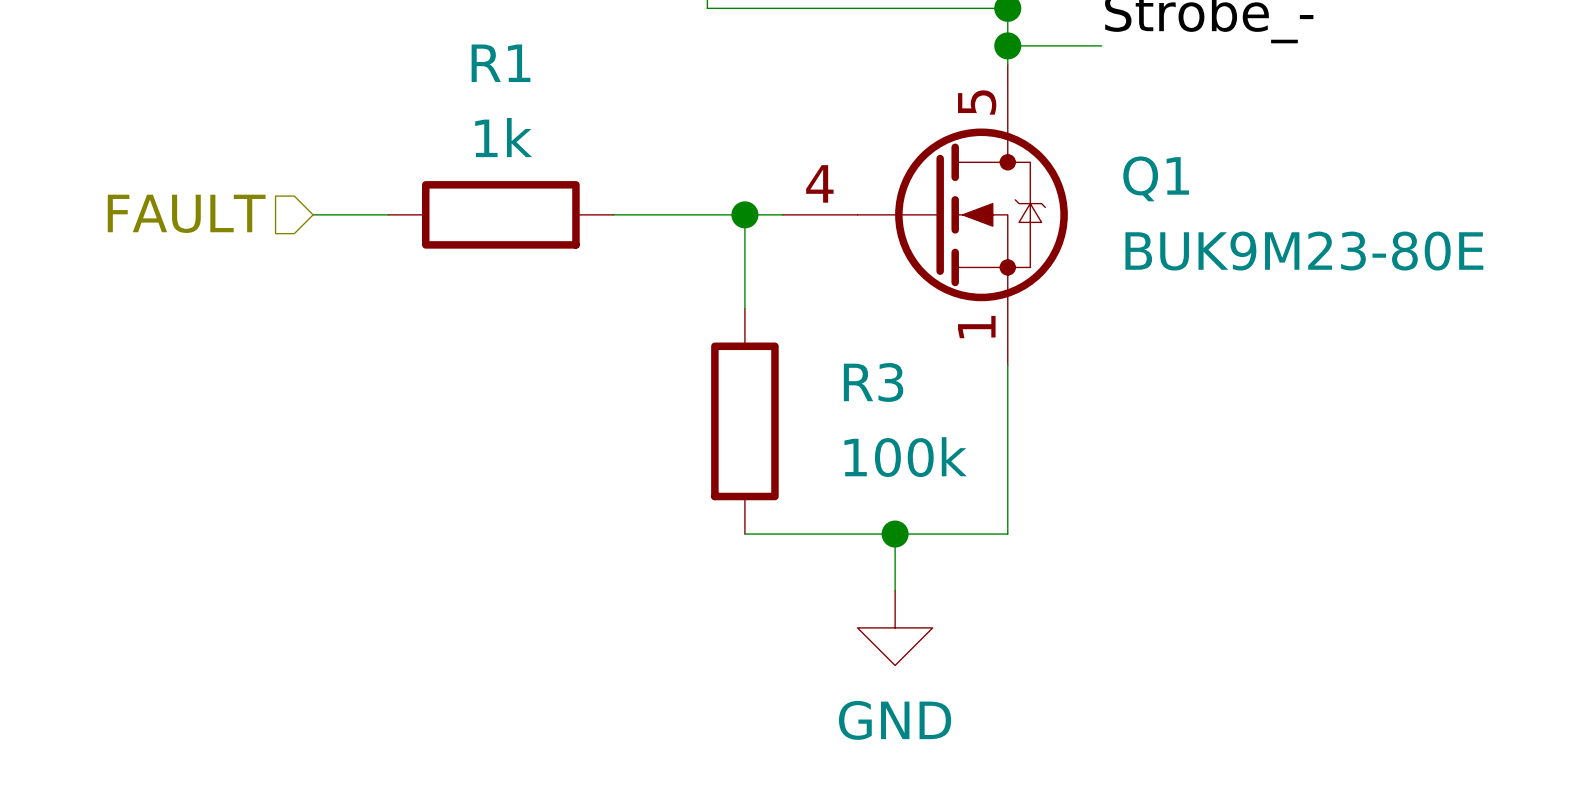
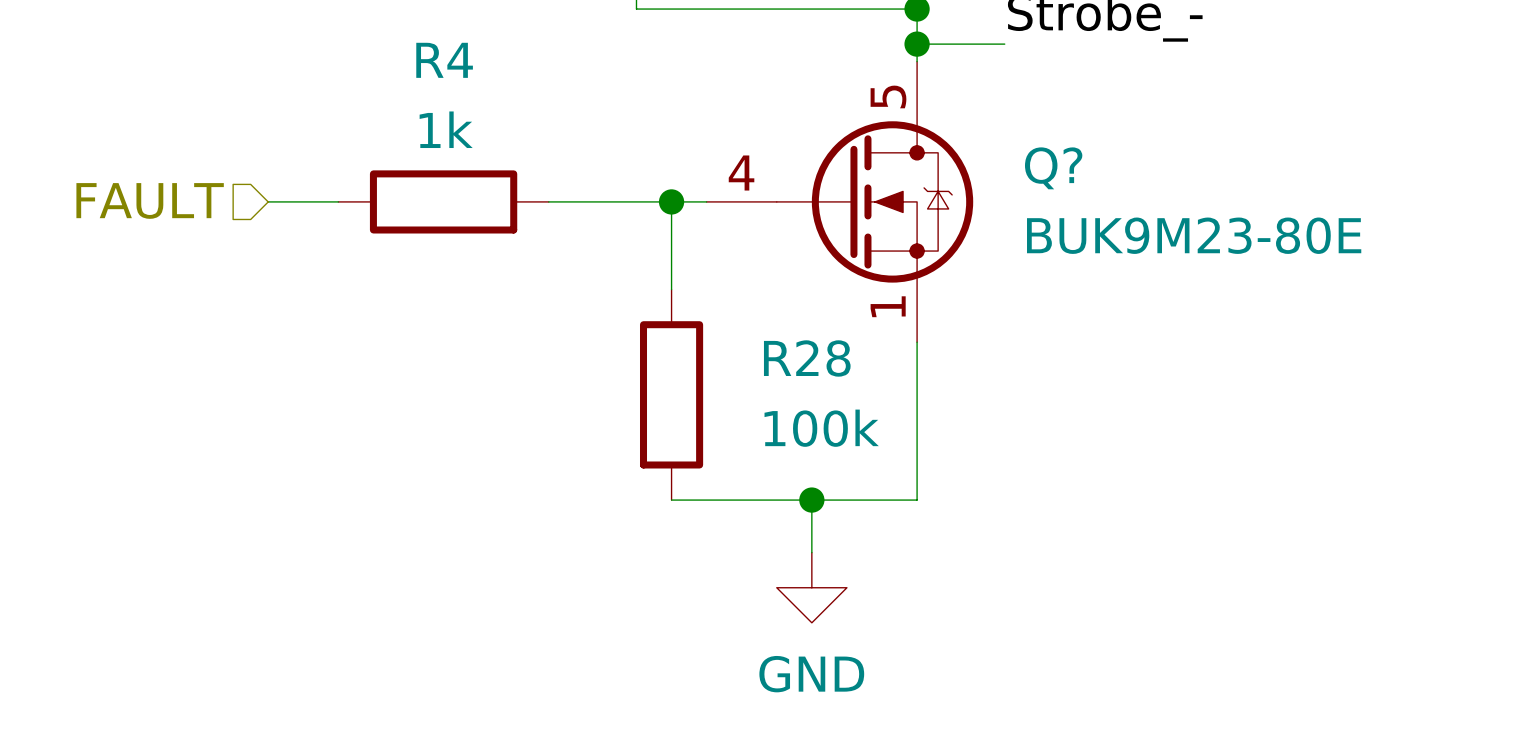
R1 name: R1 (501, 63) -> R4 (444, 60)
Q1 name: Q1 (1156, 178) -> Q? (1053, 168)
R3 name: R3 (873, 382) -> R28 (807, 358)

